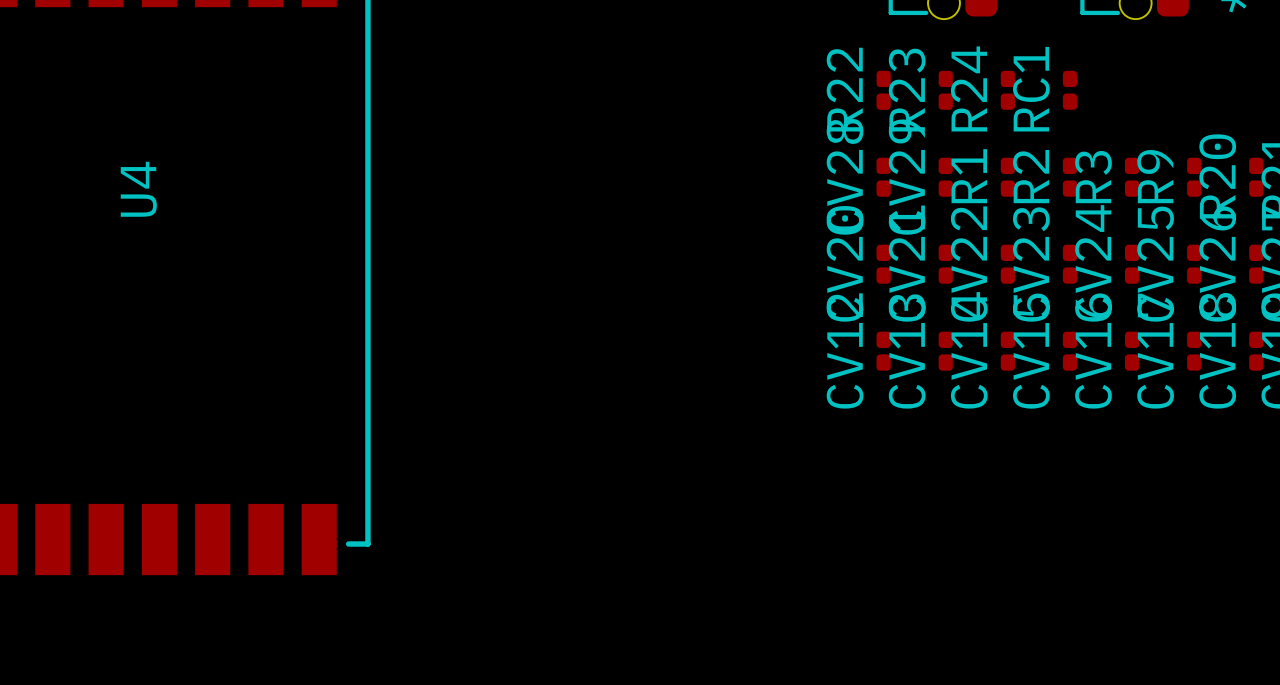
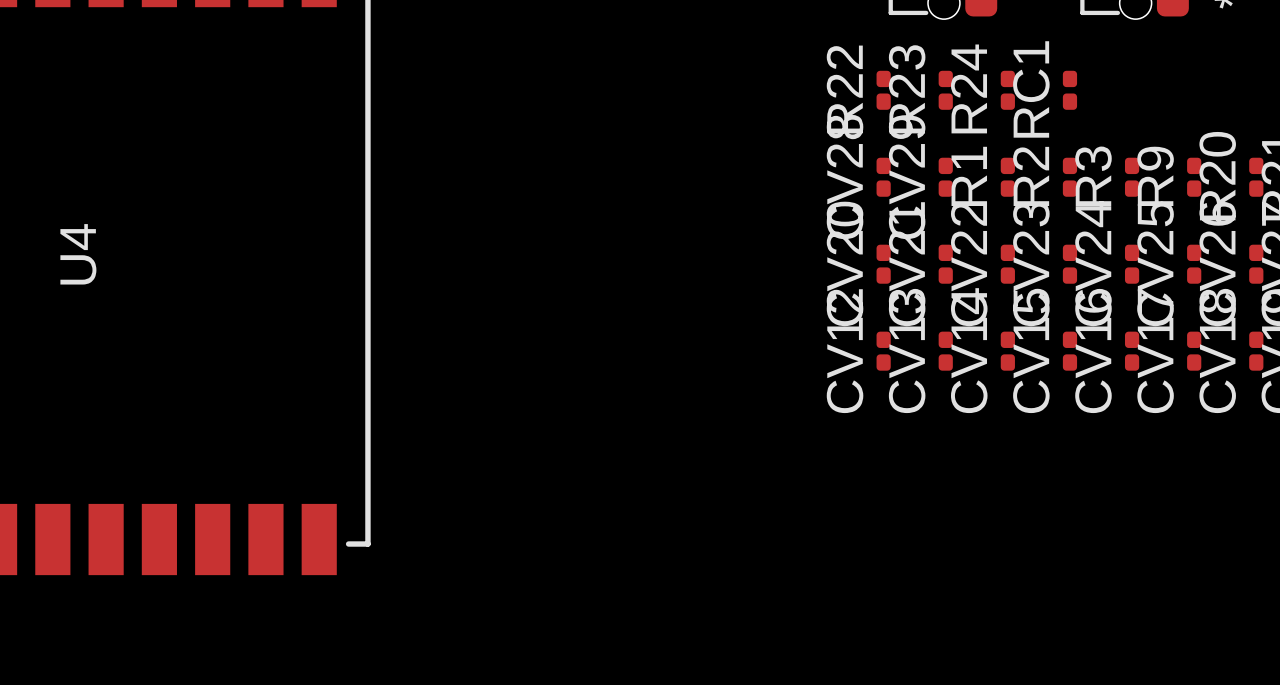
U4 name position: U4 (138, 189) -> U4 (78, 254)

